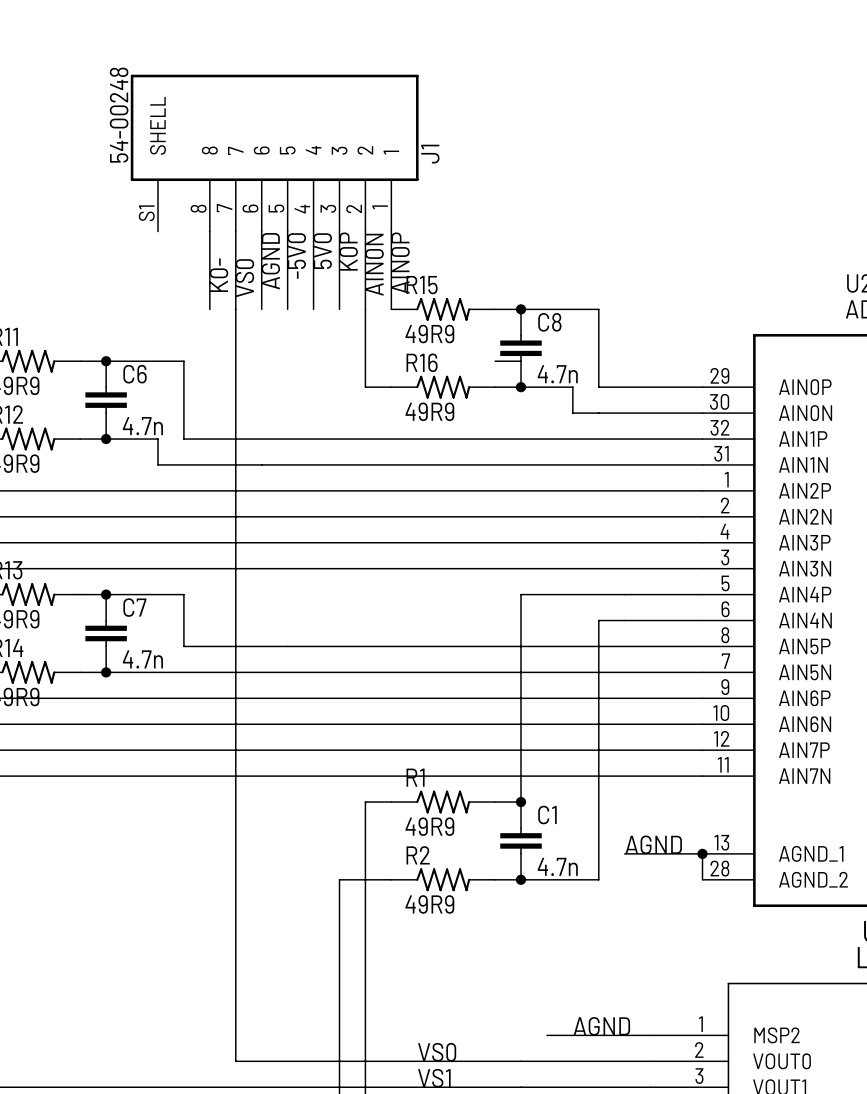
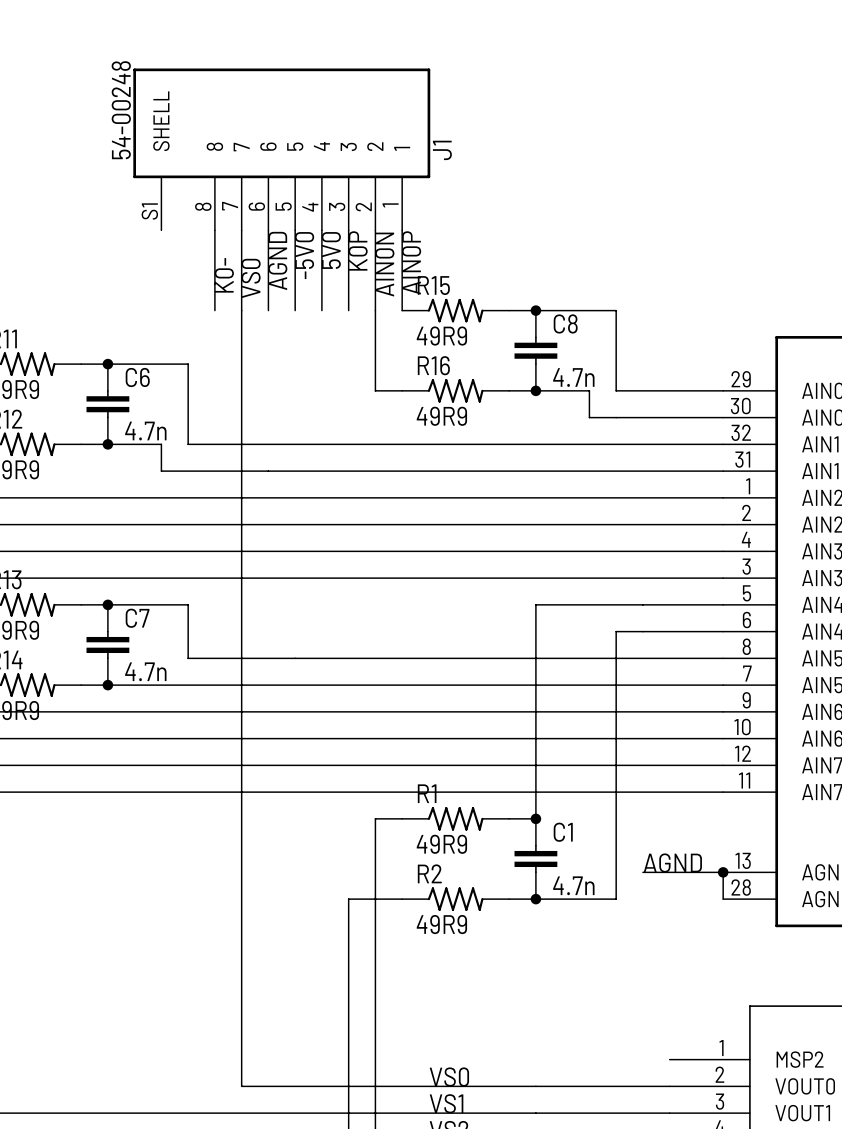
wire: (495, 361) (521, 361) -> none
label: AGND (601, 1026) -> none
wire: (546, 1035) (650, 1035) -> none

